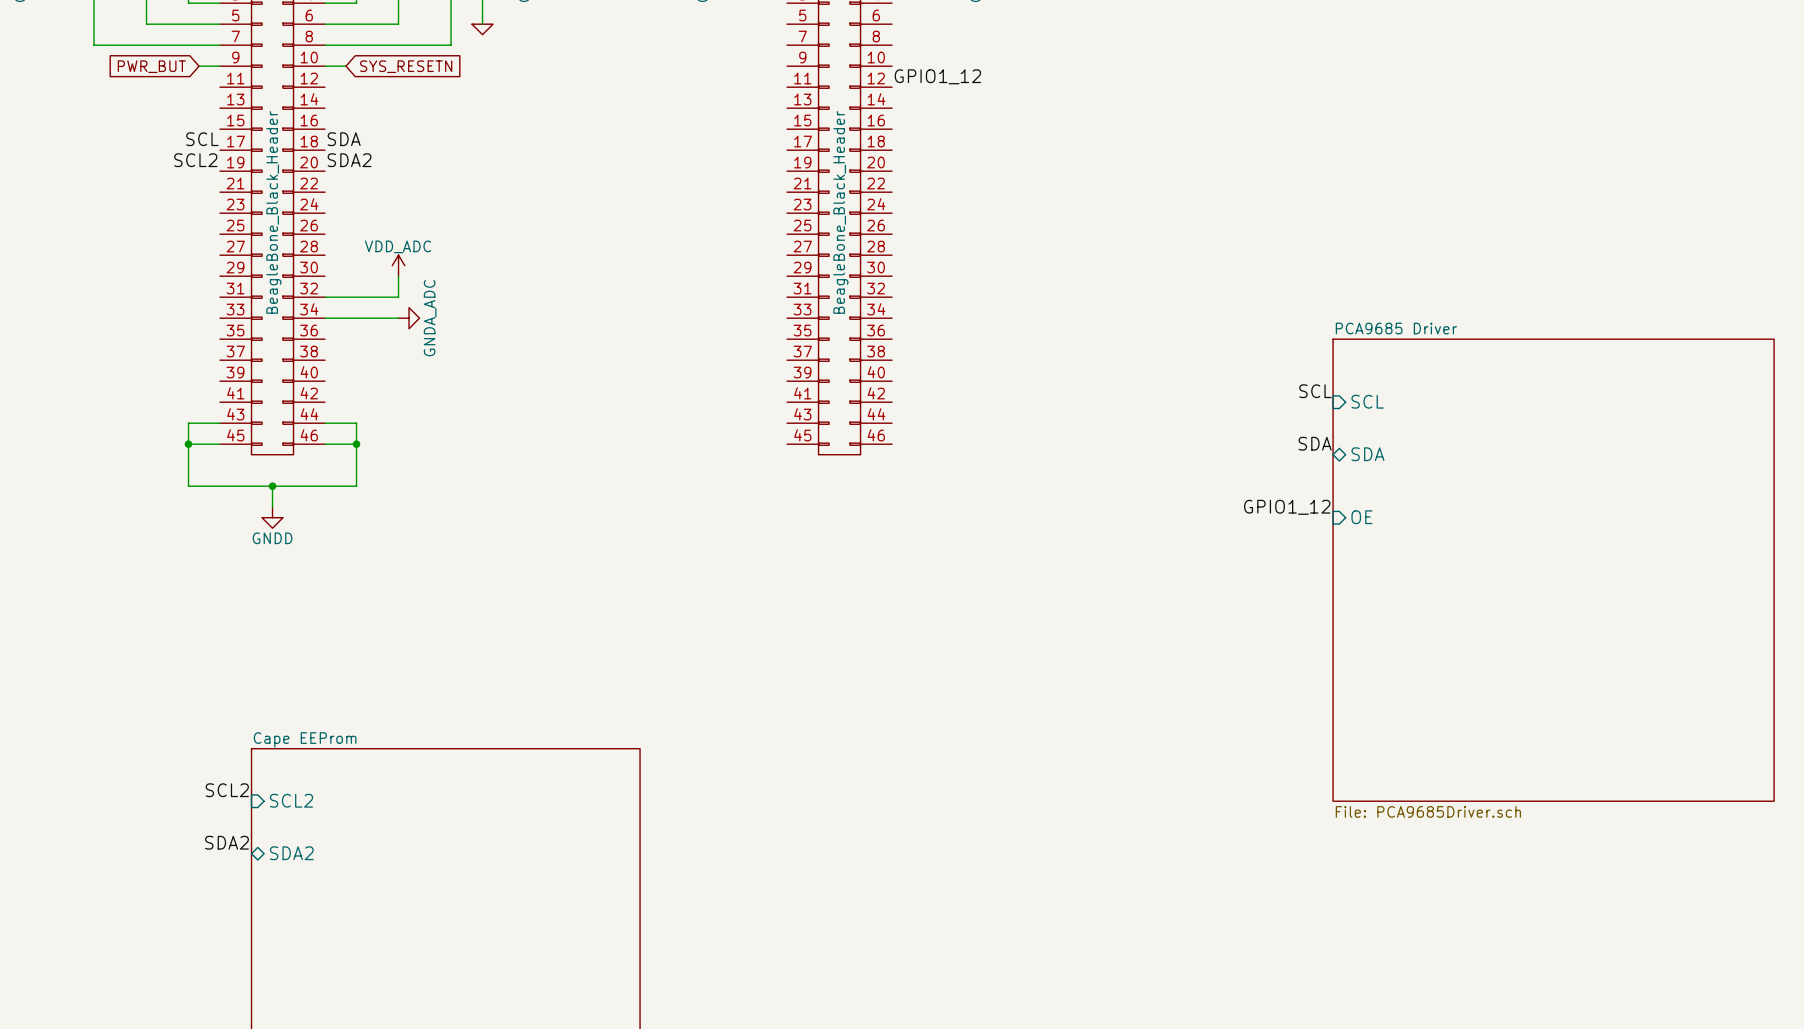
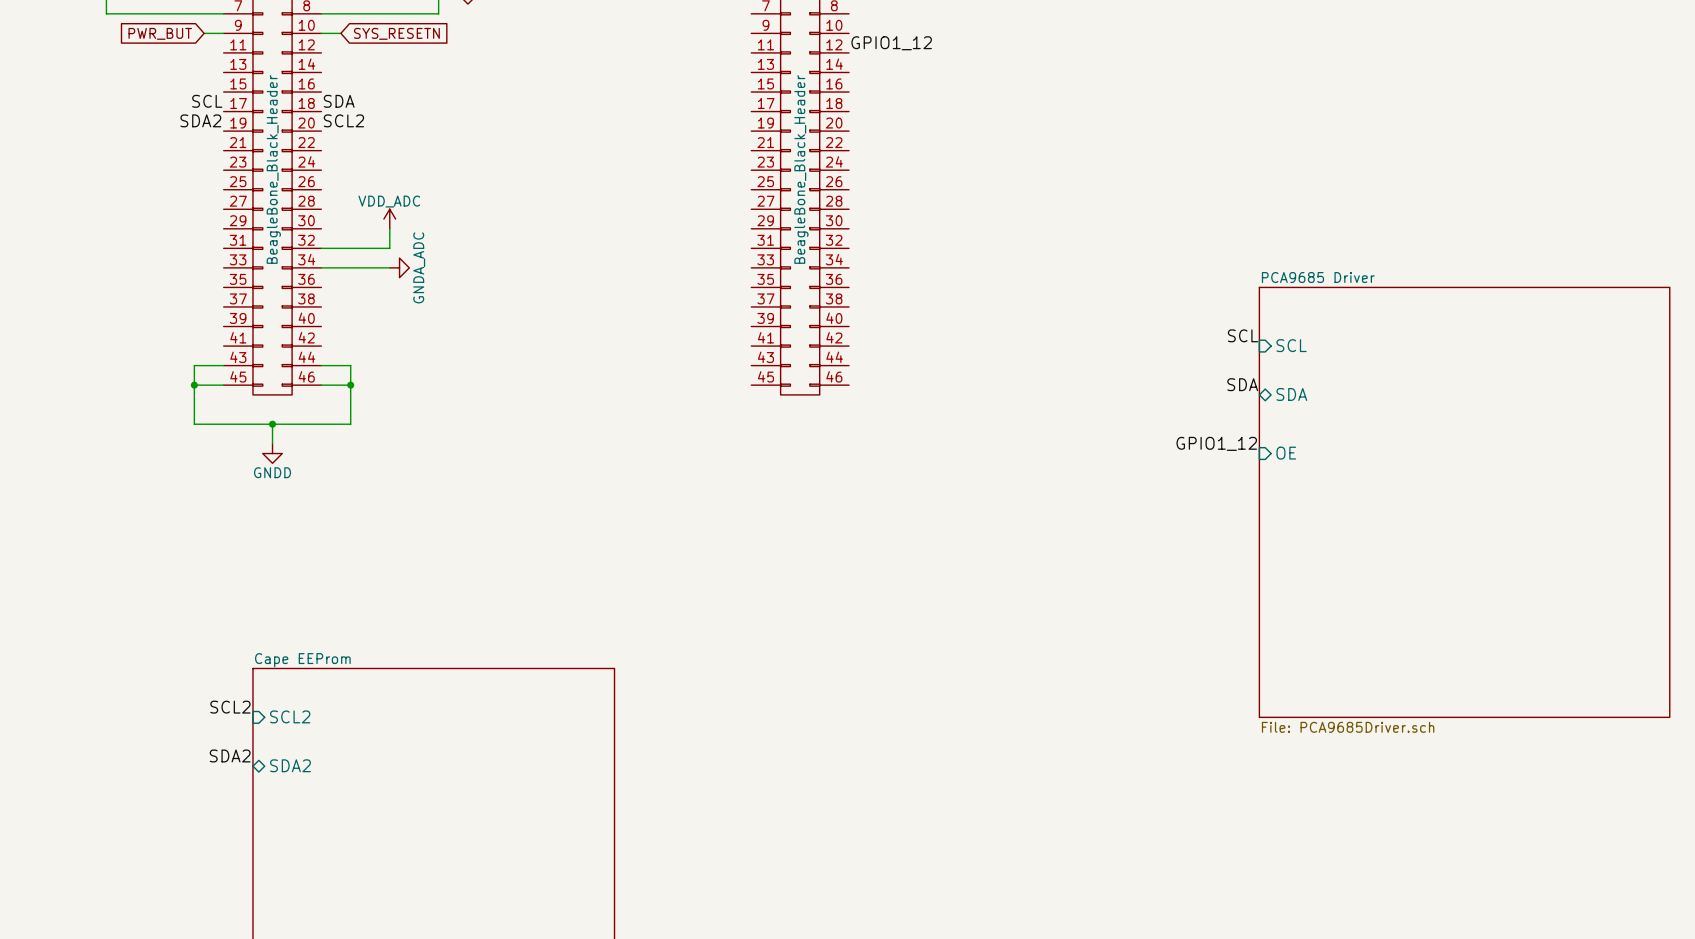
label: SCL2 (195, 160) -> SDA2 (200, 120)
label: SDA2 (349, 160) -> SCL2 (343, 120)

